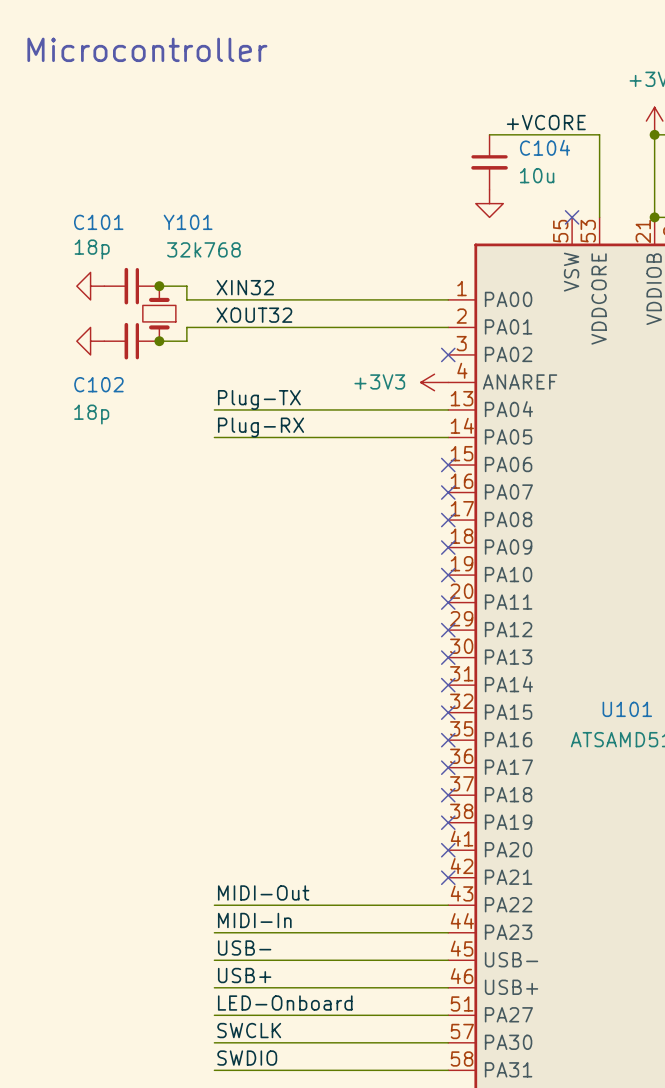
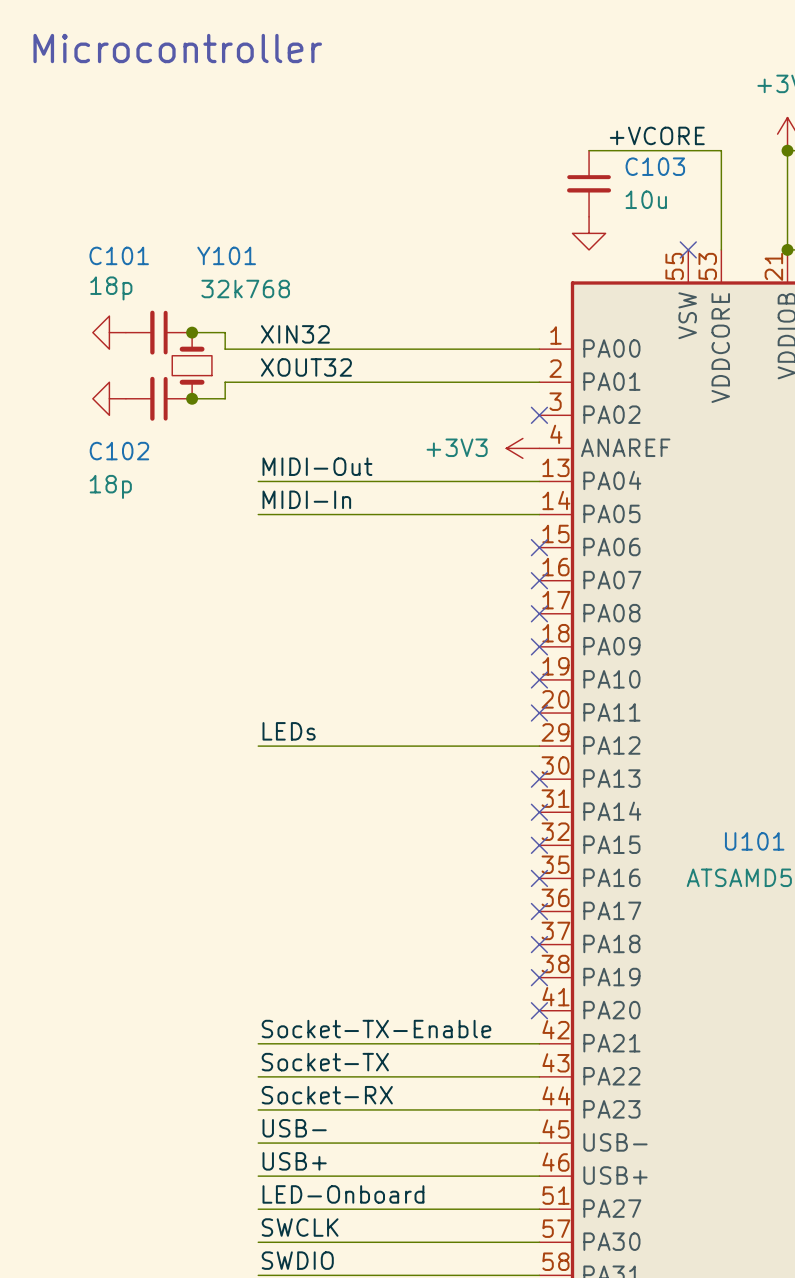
C104 name: C104 (545, 147) -> C103 (655, 166)
label: Plug-TX (259, 399) -> MIDI-Out (317, 466)
label: Plug-RX (261, 427) -> MIDI-In (306, 499)
label: none -> LEDs (289, 731)
wire: none -> (258, 746) (539, 746)
no-connect mark: (448, 630) -> none
label: none -> Socket-TX-Enable (376, 1029)
wire: none -> (258, 1043) (539, 1043)
no-connect mark: (448, 877) -> none
label: MIDI-Out (263, 892) -> Socket-TX (325, 1062)
label: MIDI-In (254, 920) -> Socket-RX (327, 1095)

